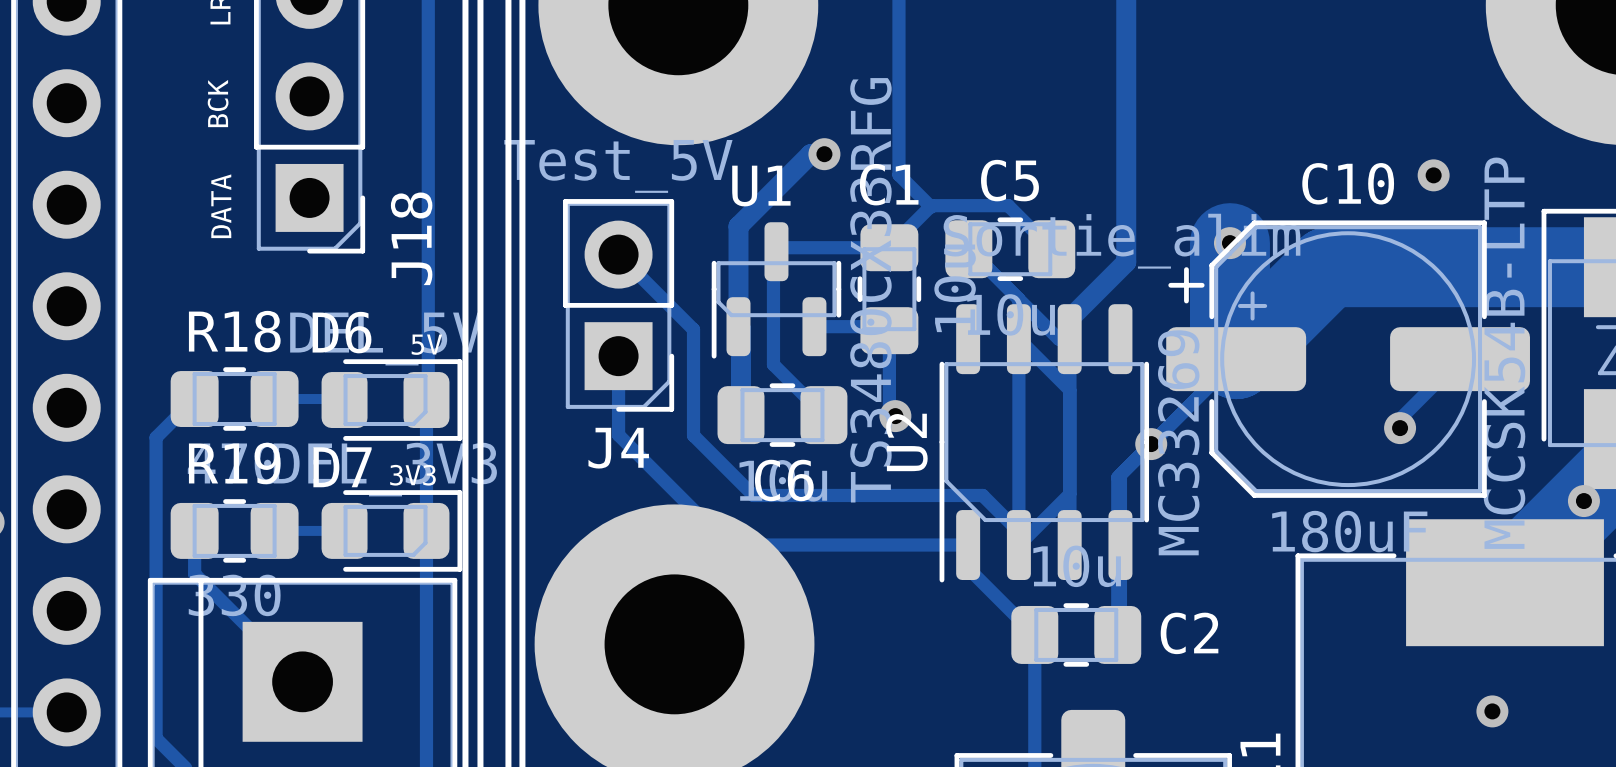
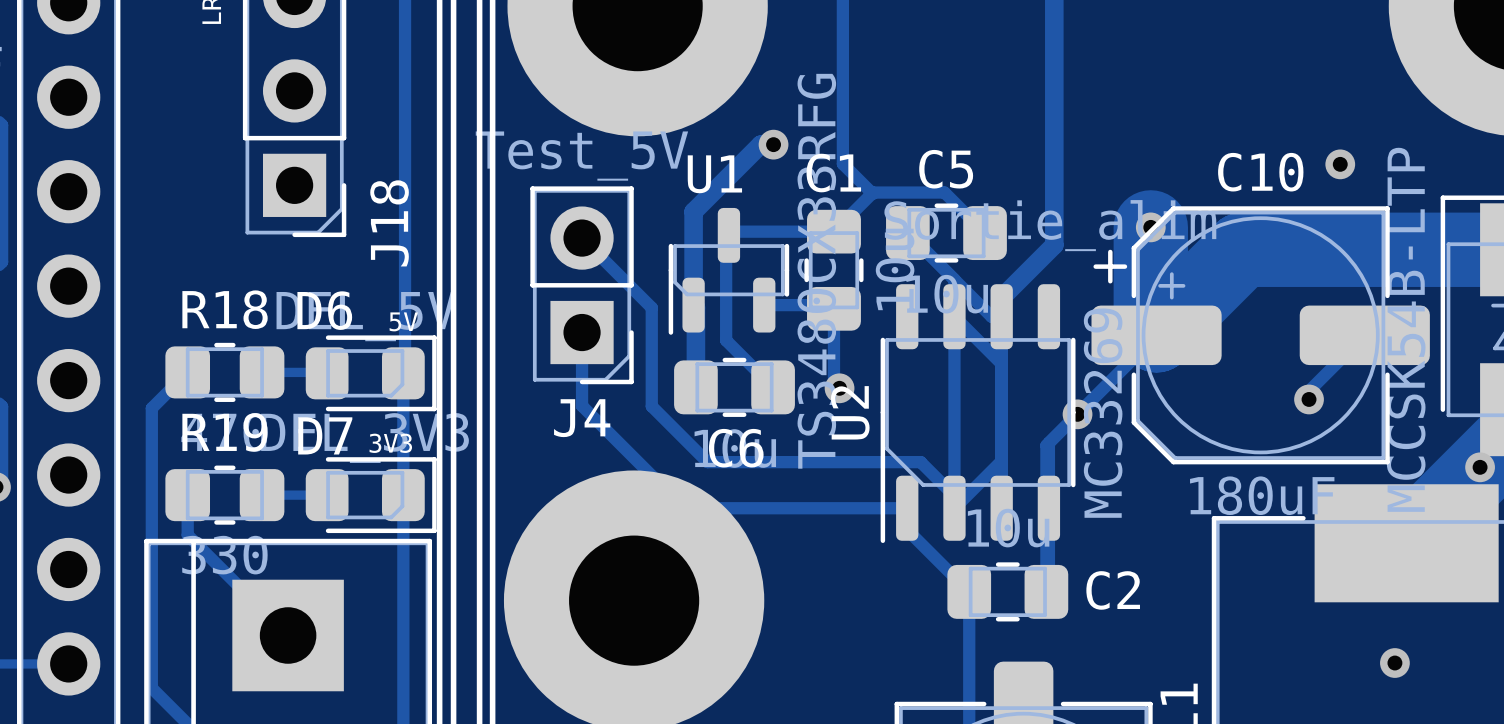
text: BCK (218, 103) -> none
text: DATA (221, 206) -> none

